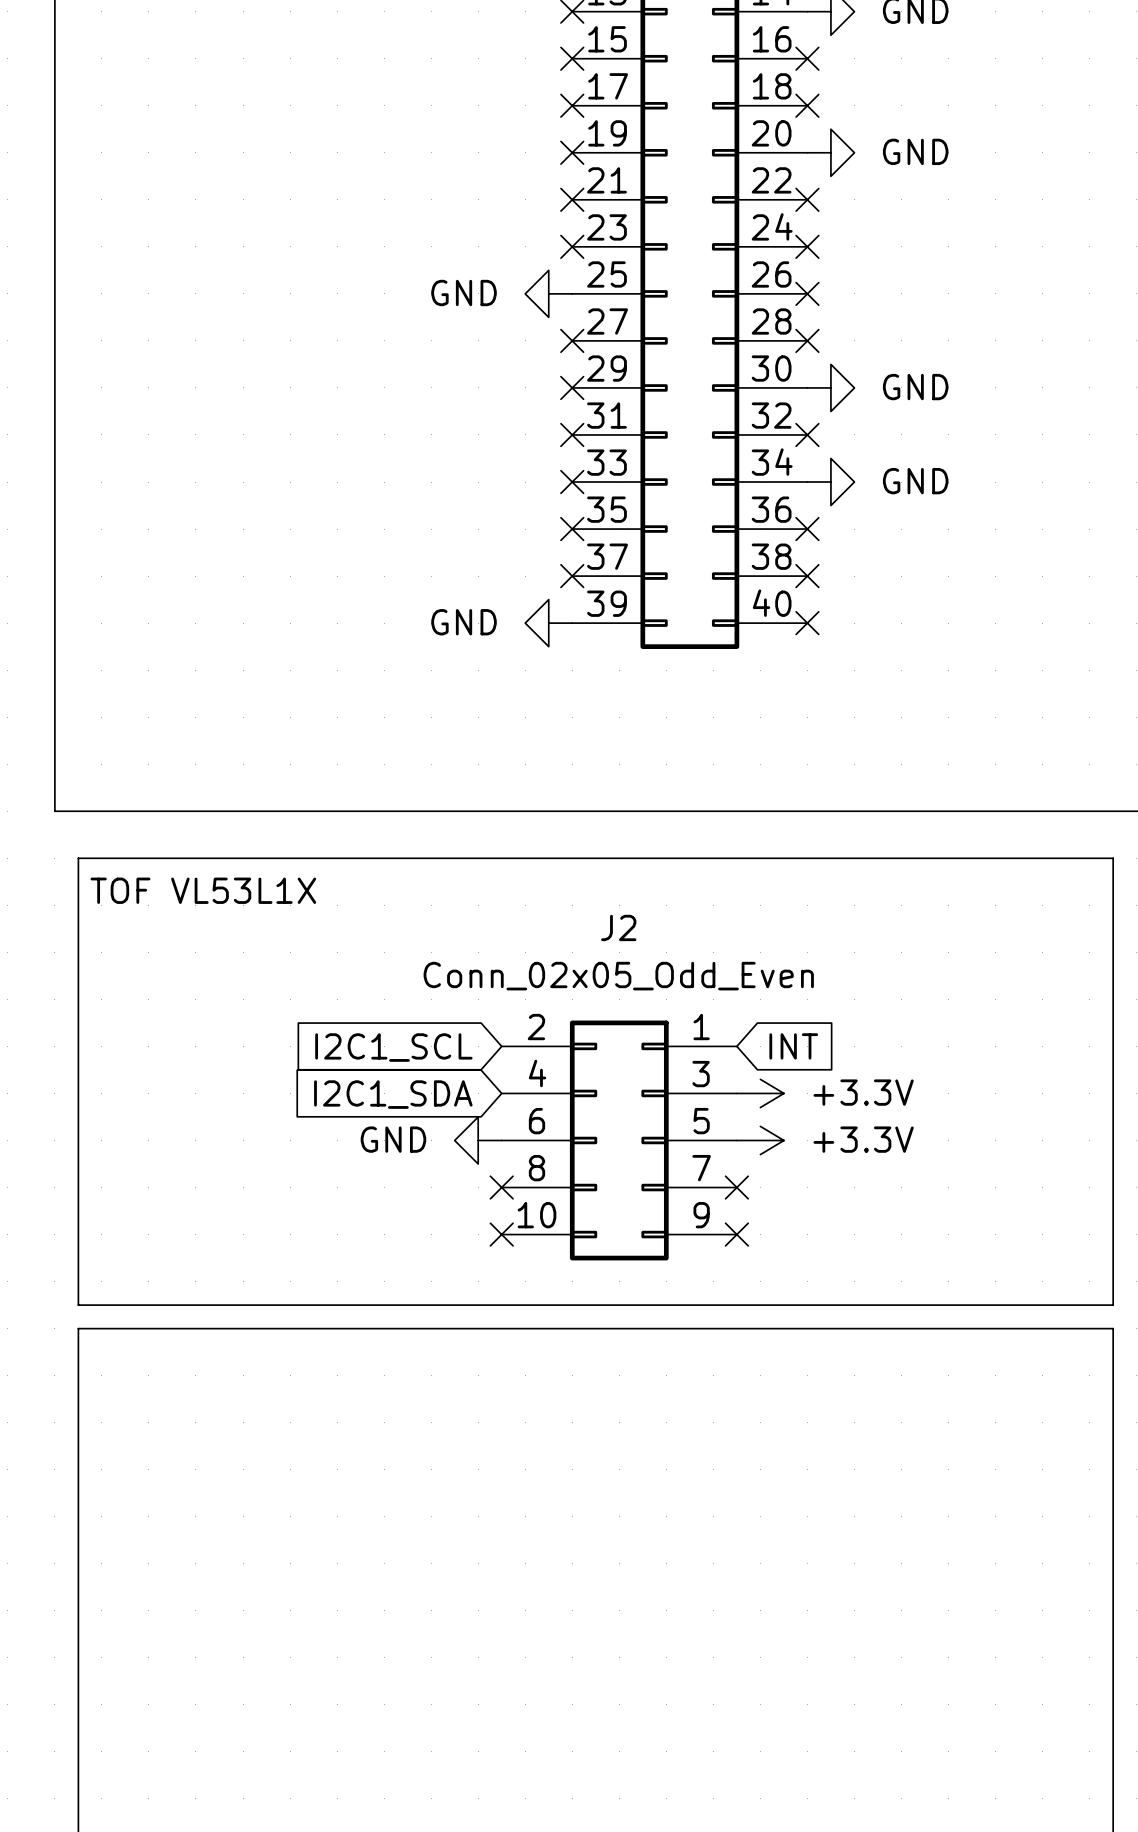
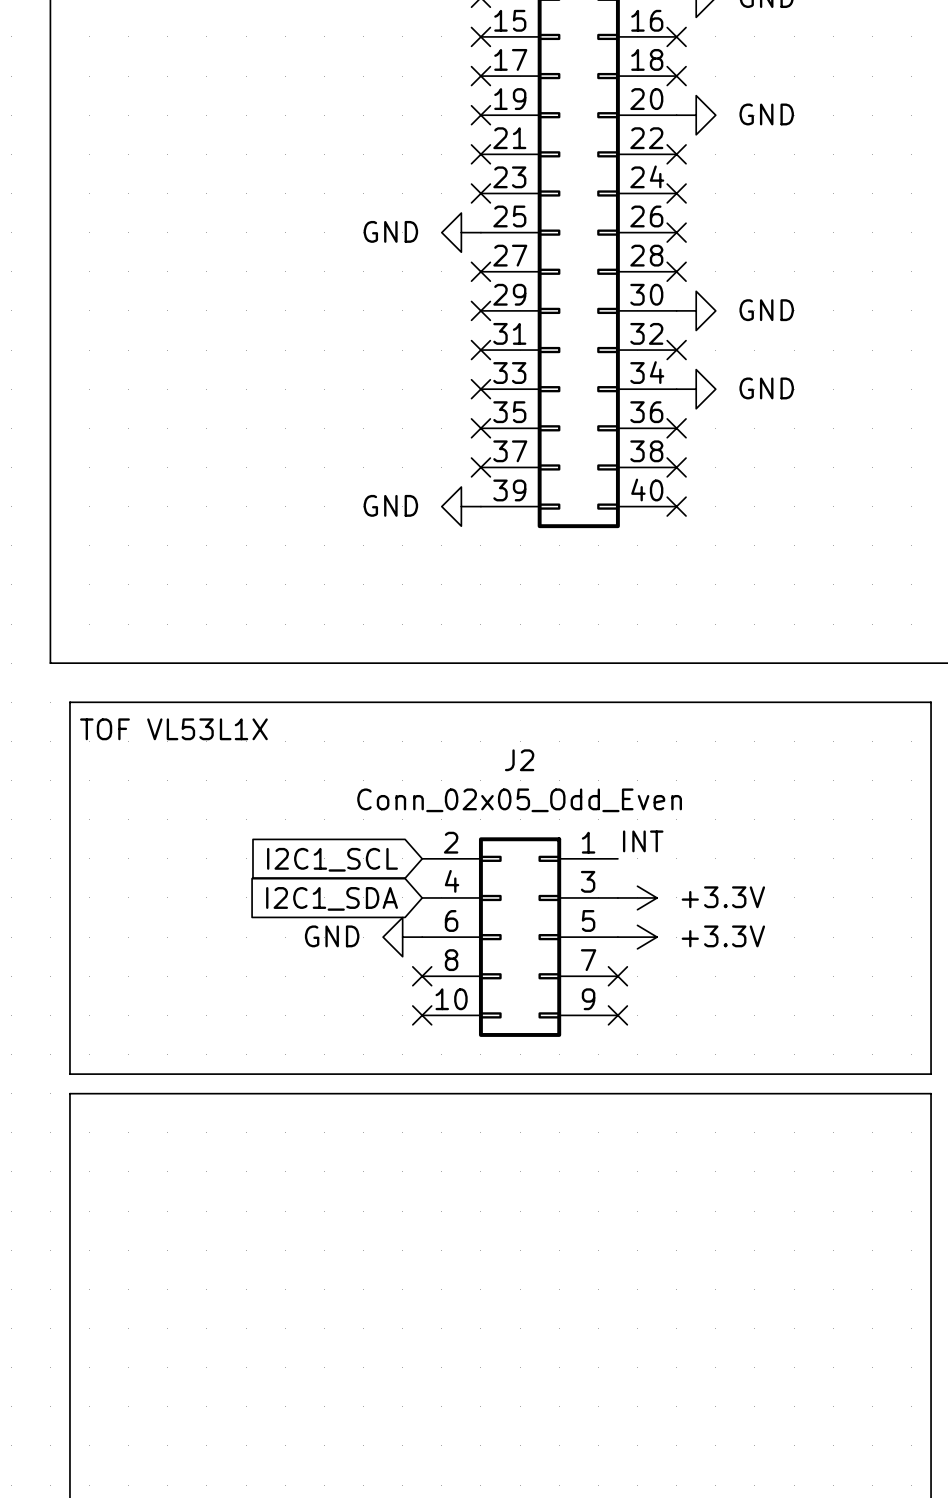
label: none -> INT (643, 841)
global label: INT (793, 1046) -> none

